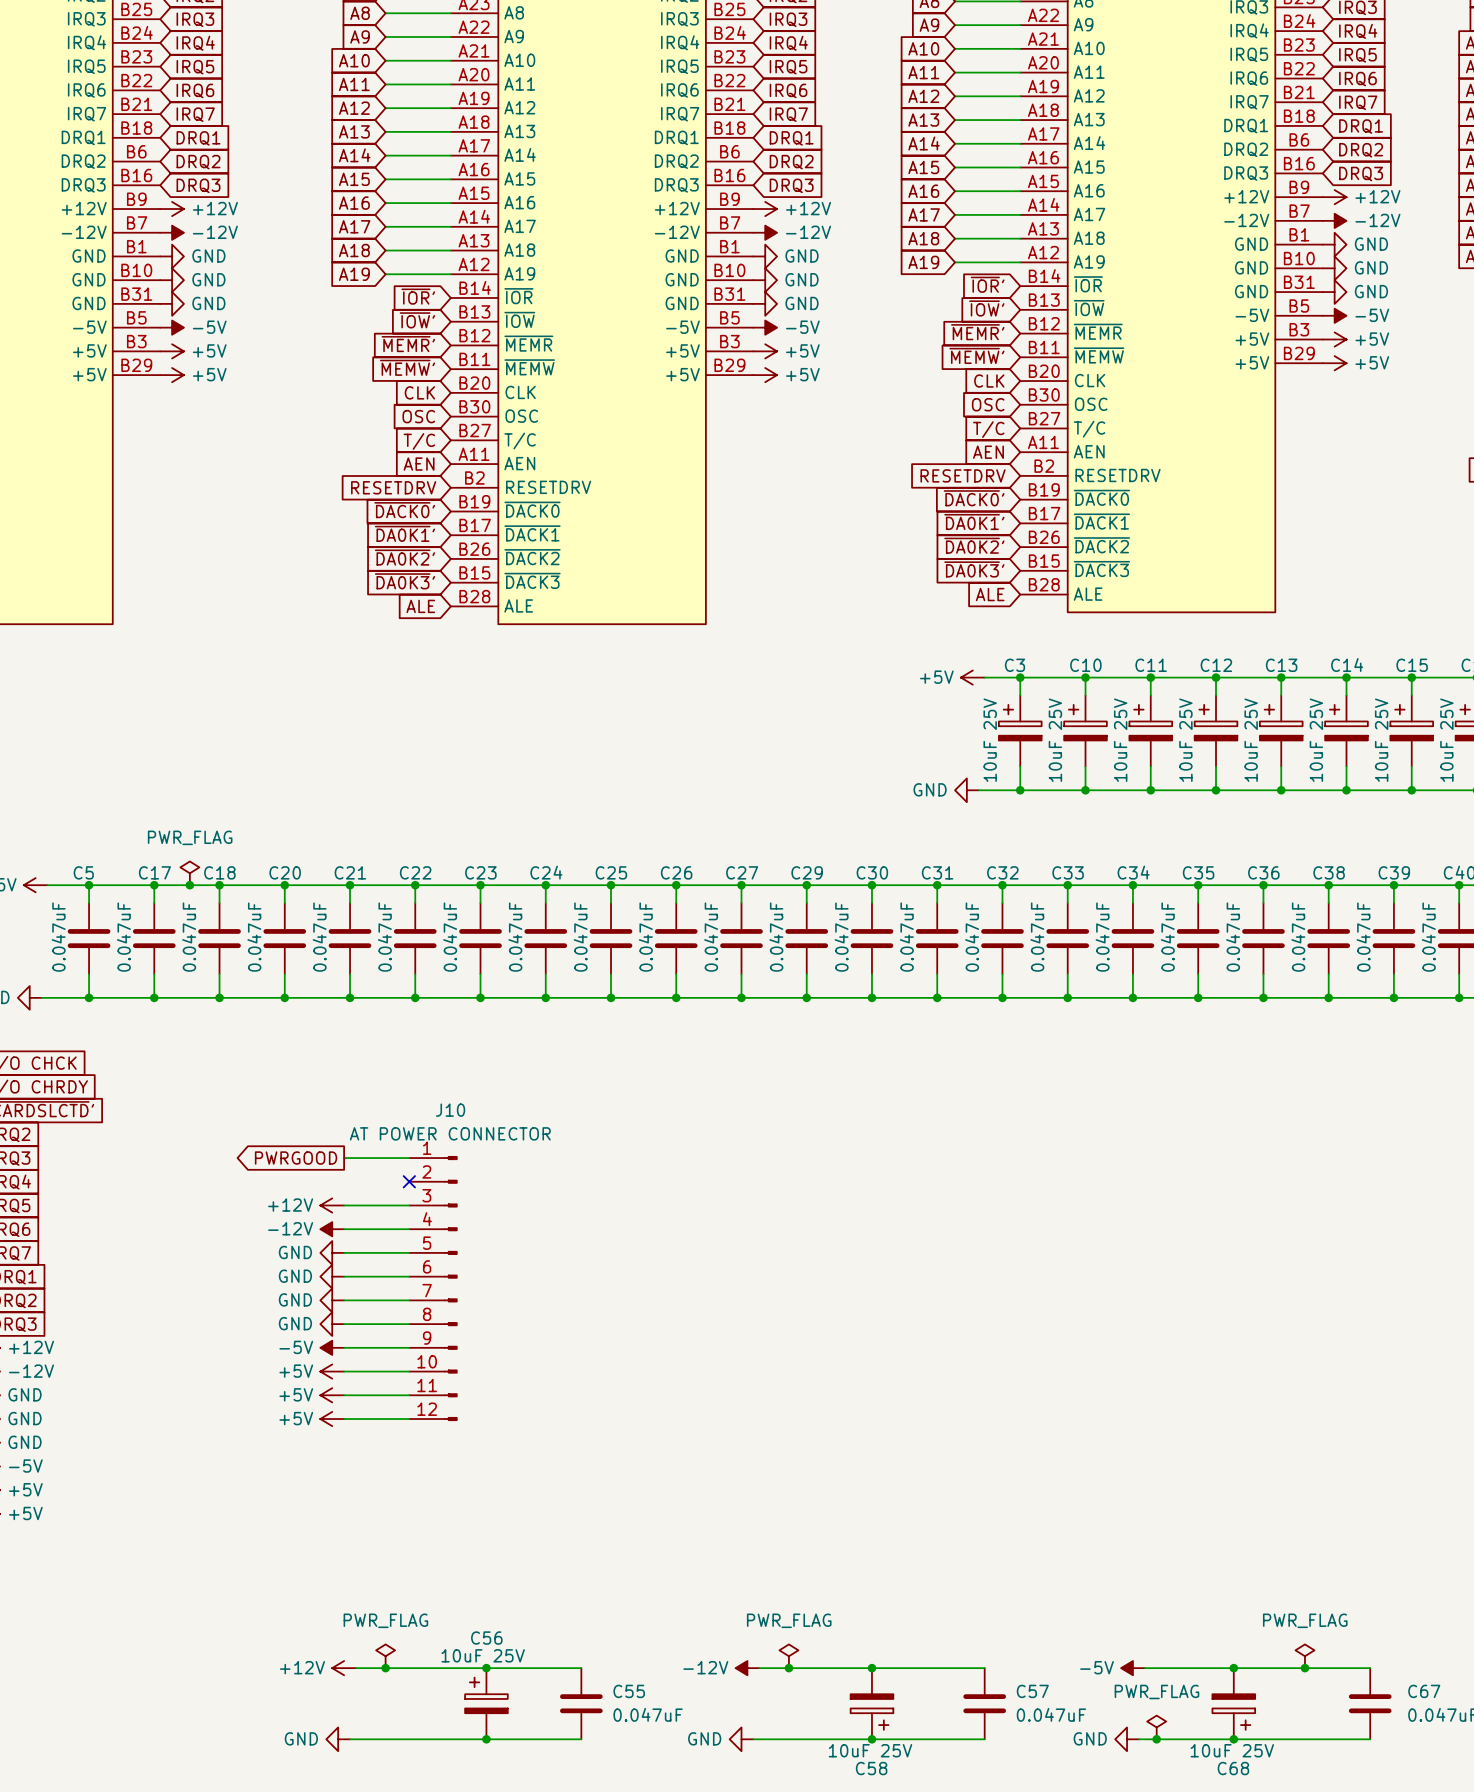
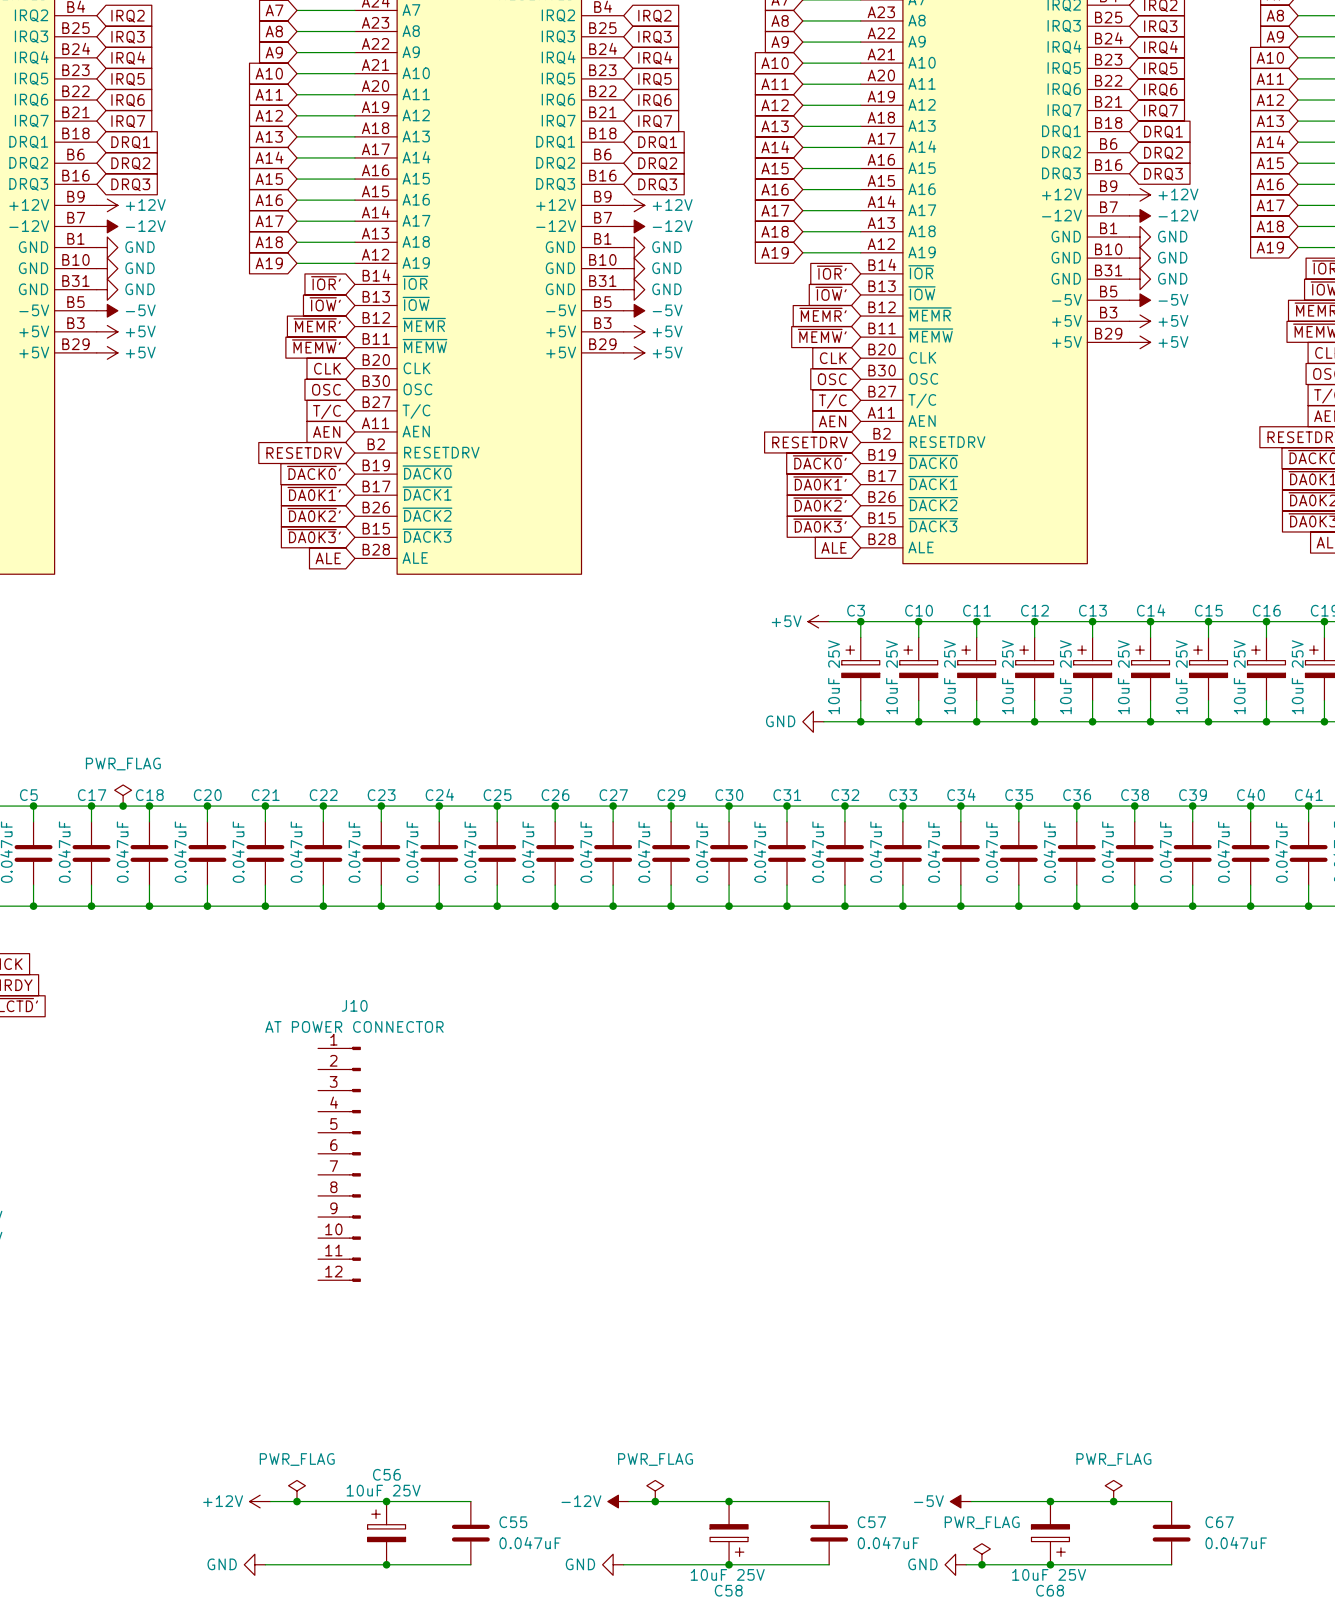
global label: PWRGOOD (296, 1158) -> none
wire: (344, 1158) (409, 1158) -> none
no-connect mark: (409, 1181) -> none
power symbol: +12V (332, 1205) -> none
wire: (344, 1205) (409, 1205) -> none
power symbol: -12V (332, 1229) -> none
wire: (344, 1229) (409, 1229) -> none
power symbol: GND (332, 1252) -> none
wire: (344, 1252) (409, 1252) -> none
power symbol: GND (332, 1276) -> none
wire: (344, 1276) (409, 1276) -> none
power symbol: GND (332, 1300) -> none
wire: (344, 1300) (409, 1300) -> none
power symbol: GND (332, 1324) -> none
wire: (344, 1324) (409, 1324) -> none
power symbol: -5V (332, 1347) -> none
wire: (344, 1347) (409, 1347) -> none
power symbol: +5V (332, 1371) -> none
wire: (344, 1371) (409, 1371) -> none
power symbol: +5V (332, 1395) -> none
wire: (344, 1395) (409, 1395) -> none
power symbol: +5V (332, 1419) -> none
wire: (344, 1419) (409, 1419) -> none

